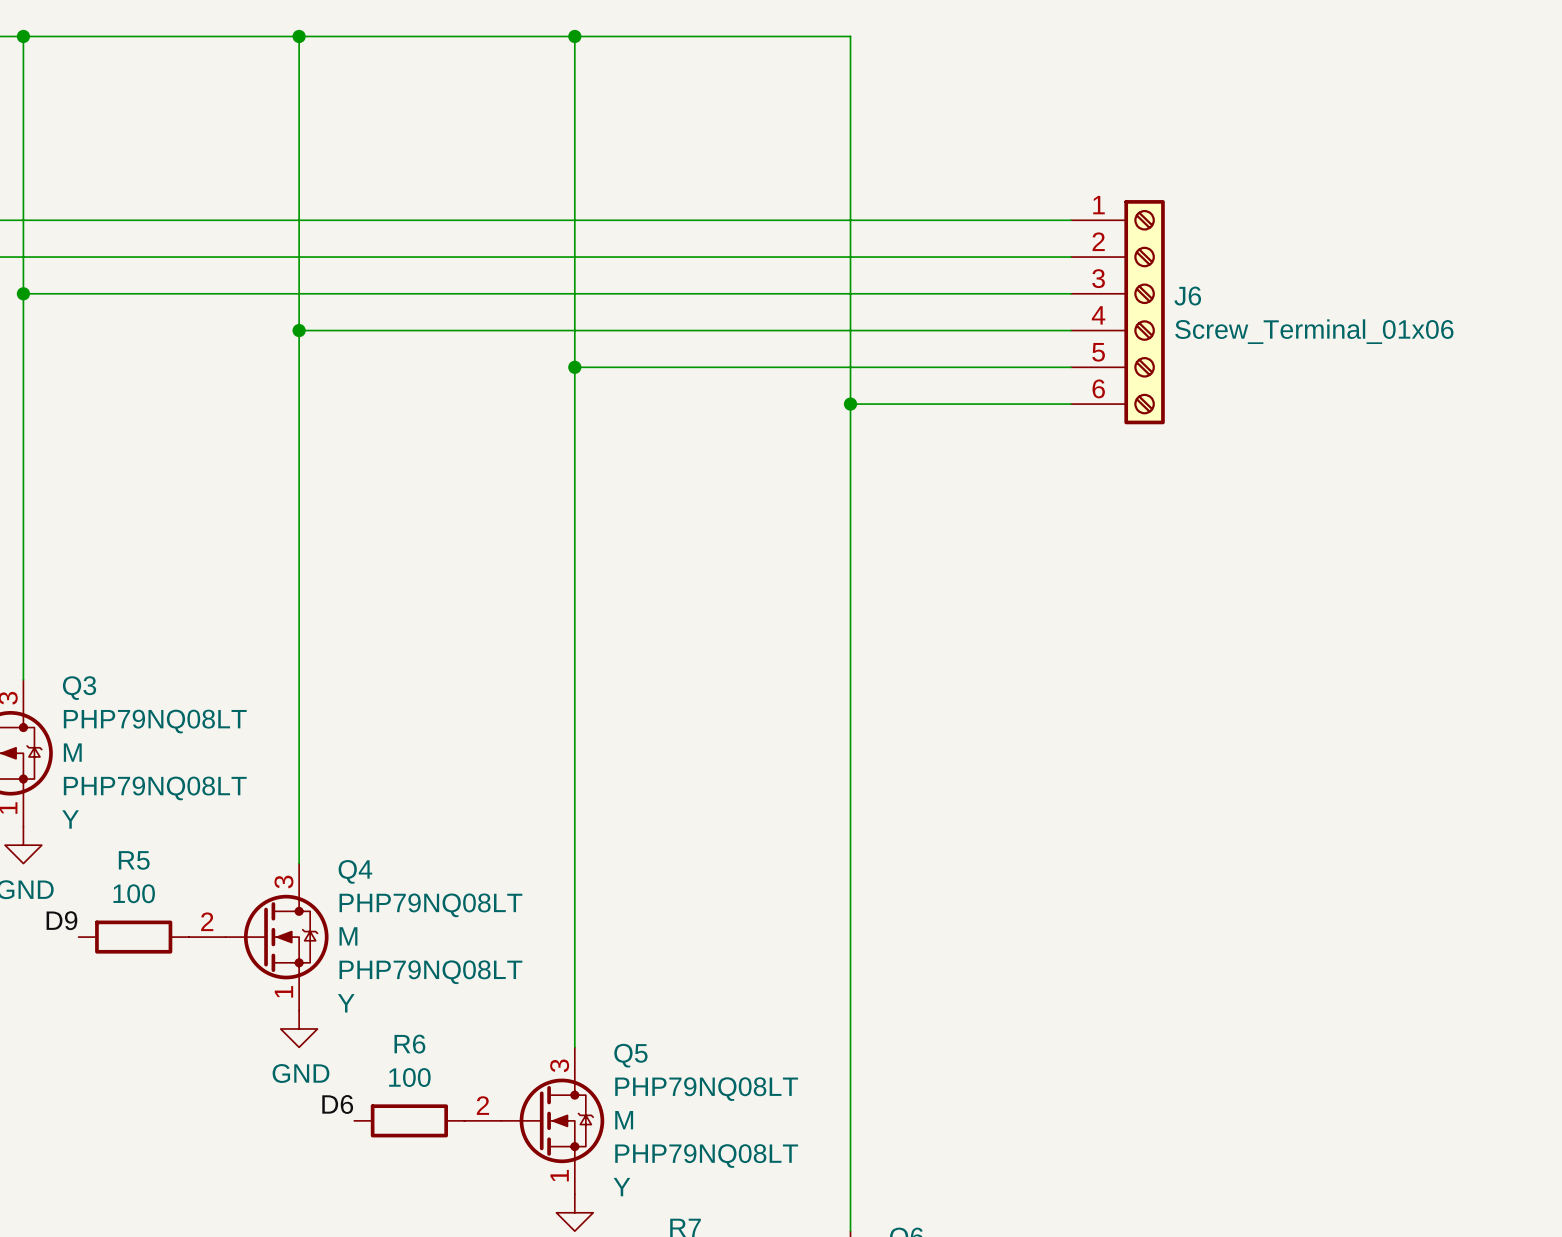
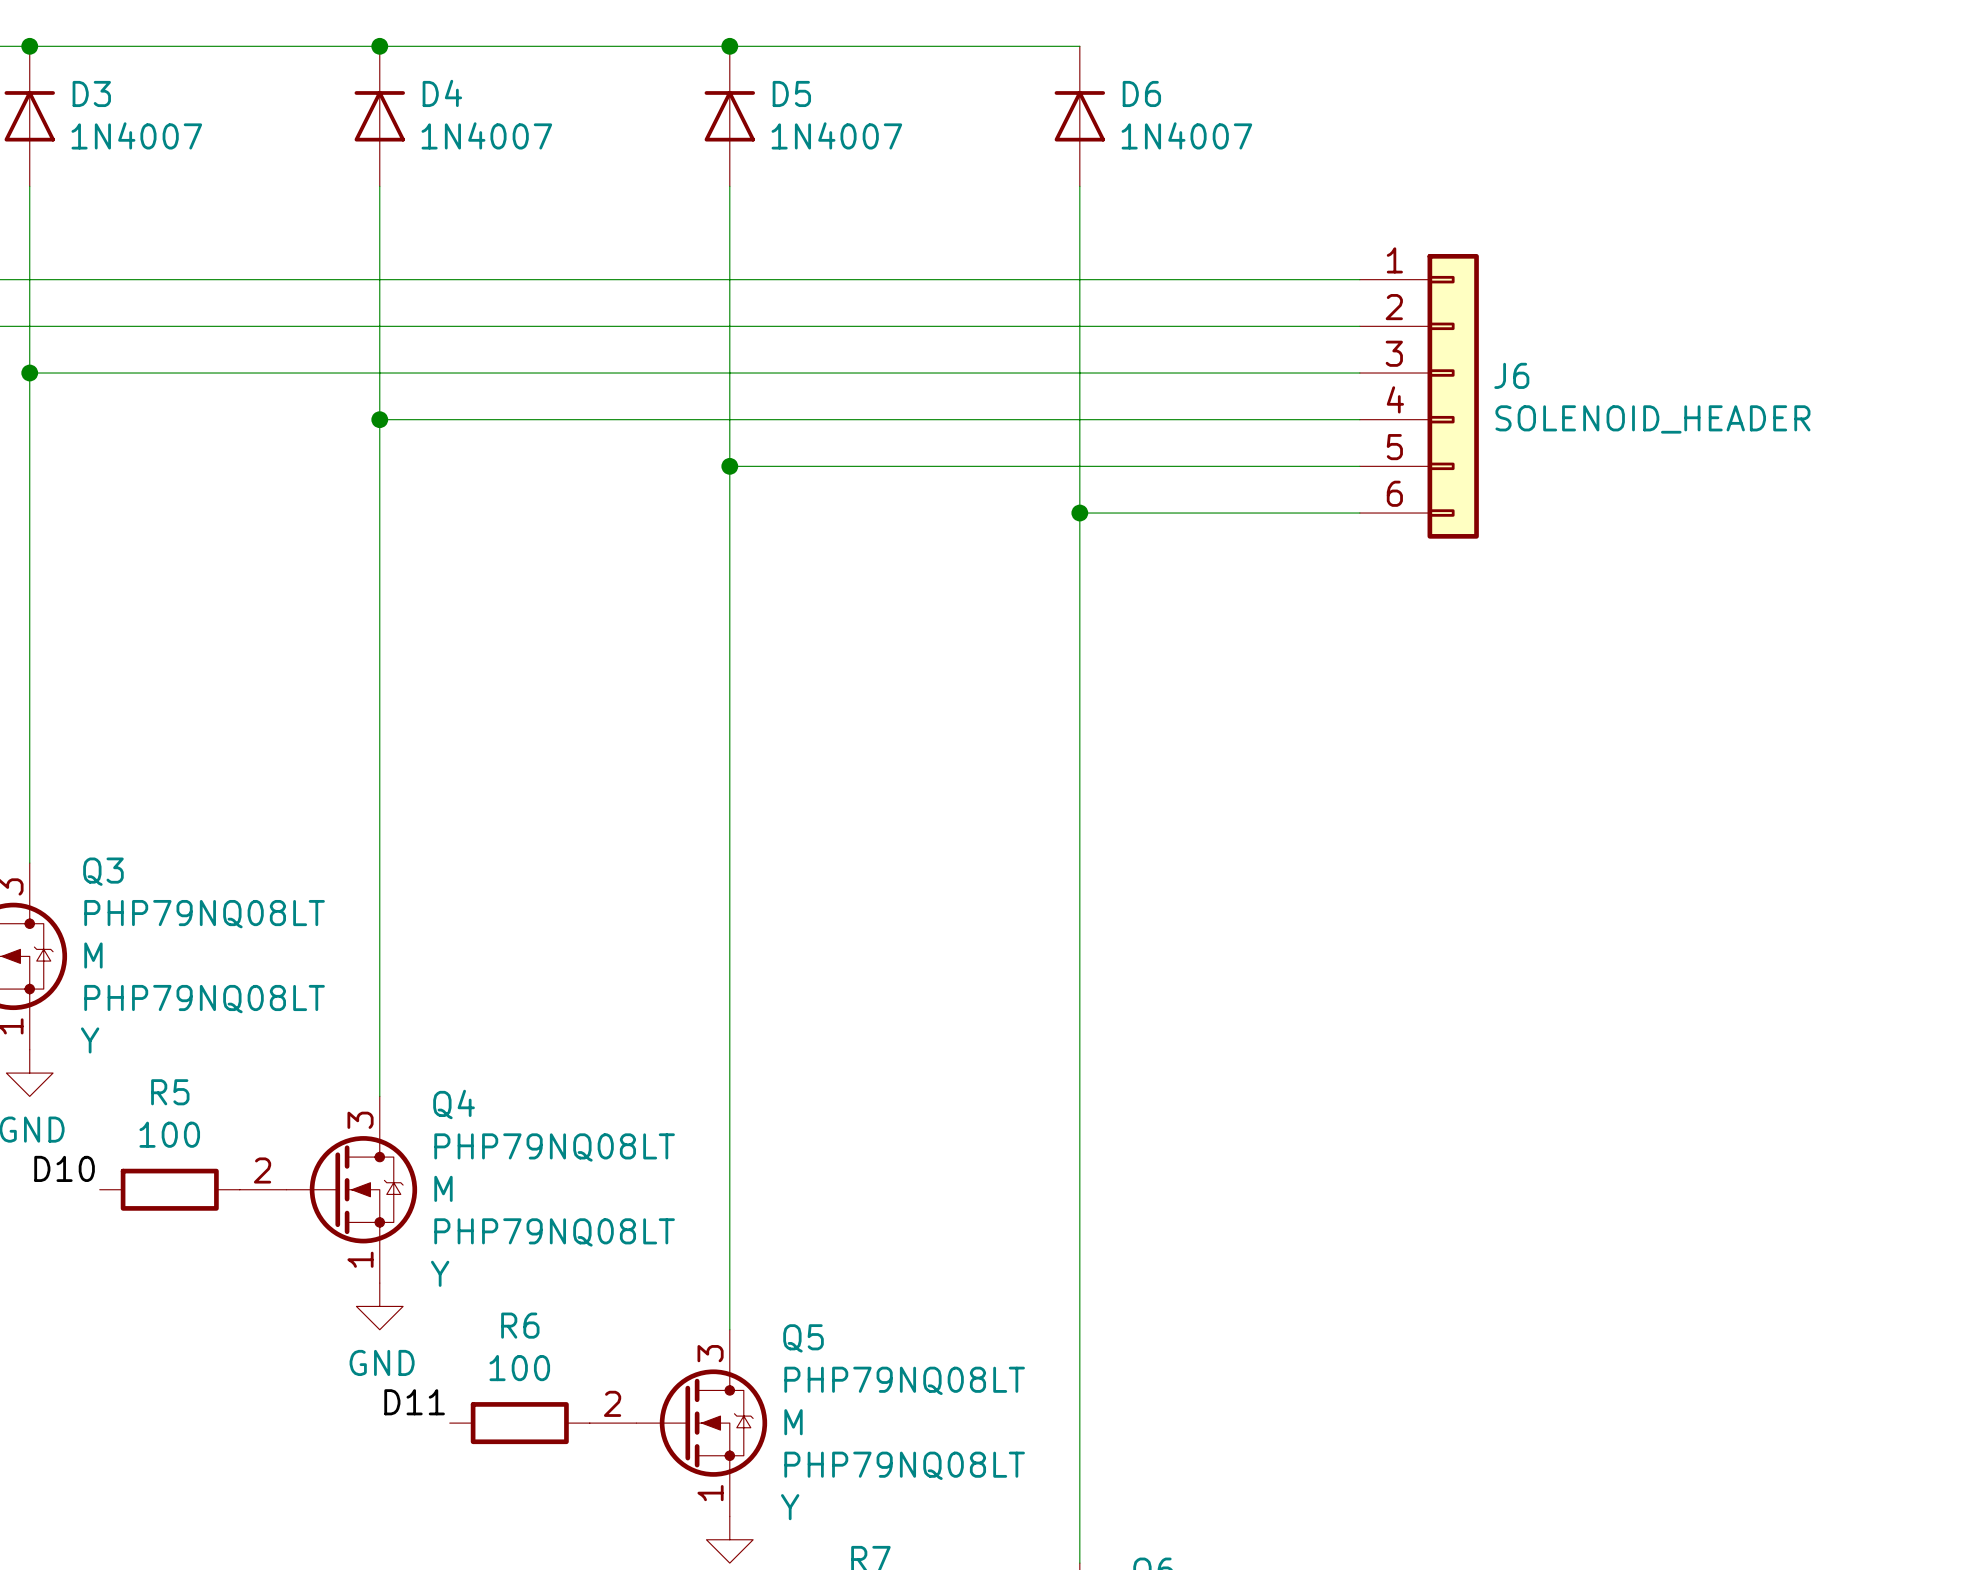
D3: none -> 1N4007 (29, 116)
D4: none -> 1N4007 (379, 116)
D5: none -> 1N4007 (729, 116)
D6: none -> 1N4007 (1079, 116)
J6 symbol: [1071, 200, 1165, 425] -> [1359, 253, 1479, 539]
J6 value: Screw_Terminal_01x06 (1314, 331) -> SOLENOID_HEADER (1652, 419)
label: D9 (61, 920) -> D10 (64, 1168)
label: D6 (337, 1104) -> D11 (414, 1402)

